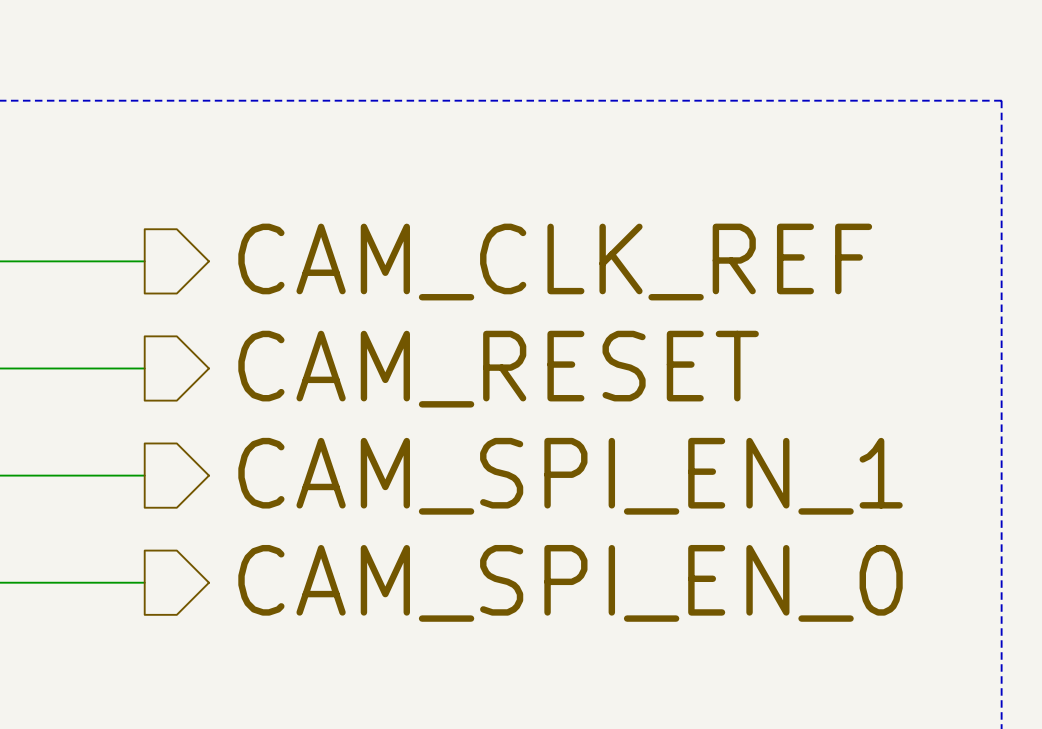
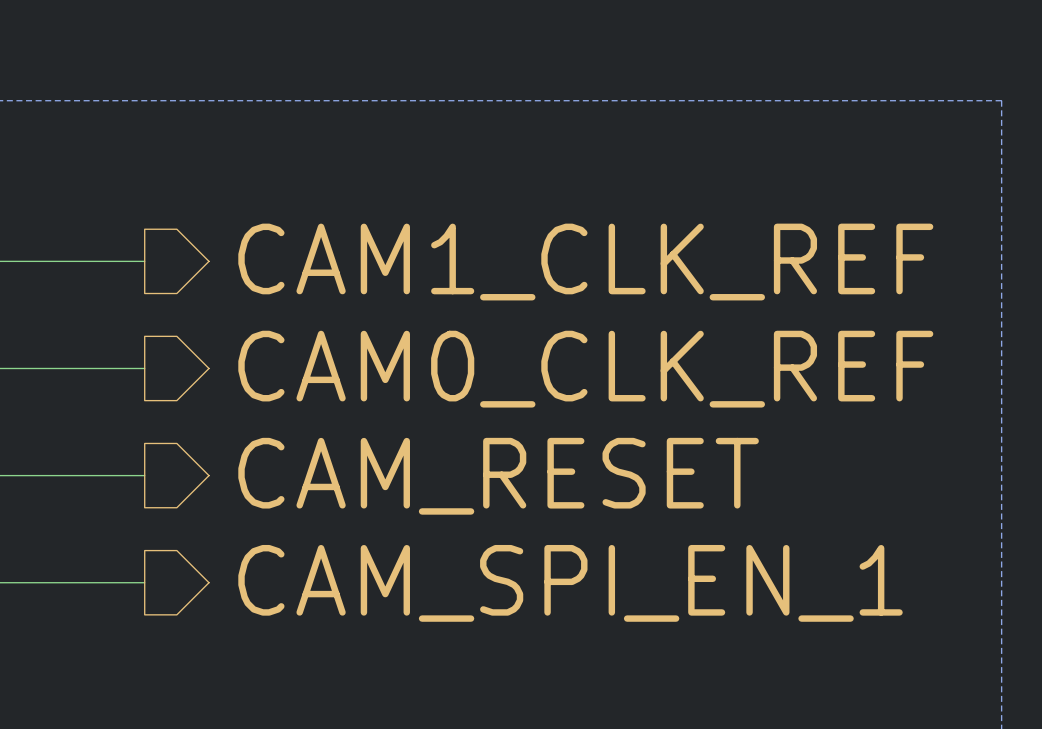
hierarchical label: CAM_CLK_REF (555, 262) -> CAM1_CLK_REF (585, 262)
hierarchical label: CAM_RESET (498, 369) -> CAM0_CLK_REF (585, 369)
hierarchical label: CAM_SPI_EN_1 (570, 476) -> CAM_RESET (498, 476)
hierarchical label: CAM_SPI_EN_0 (570, 583) -> CAM_SPI_EN_1 (570, 583)

